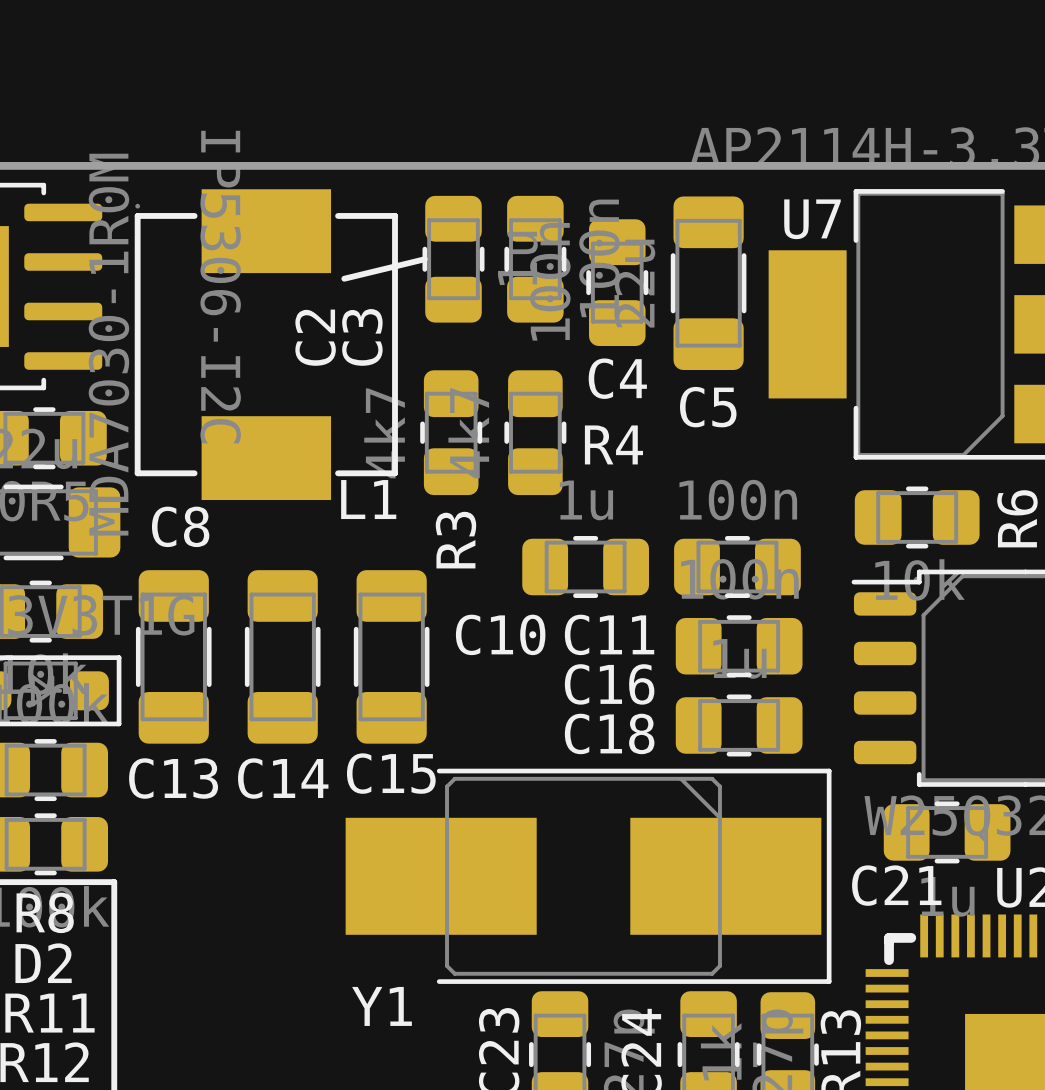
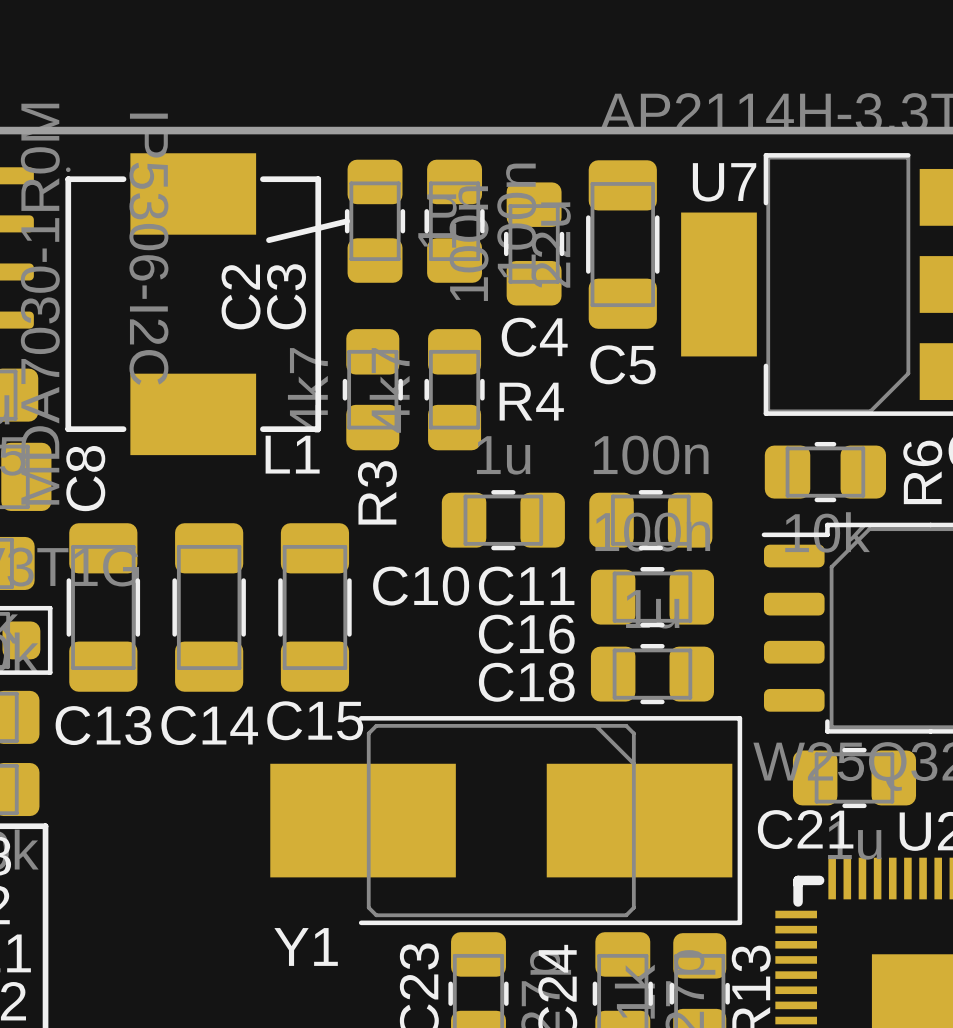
C8 name rotation: 0° (180, 526) -> 90° counterclockwise (85, 478)

